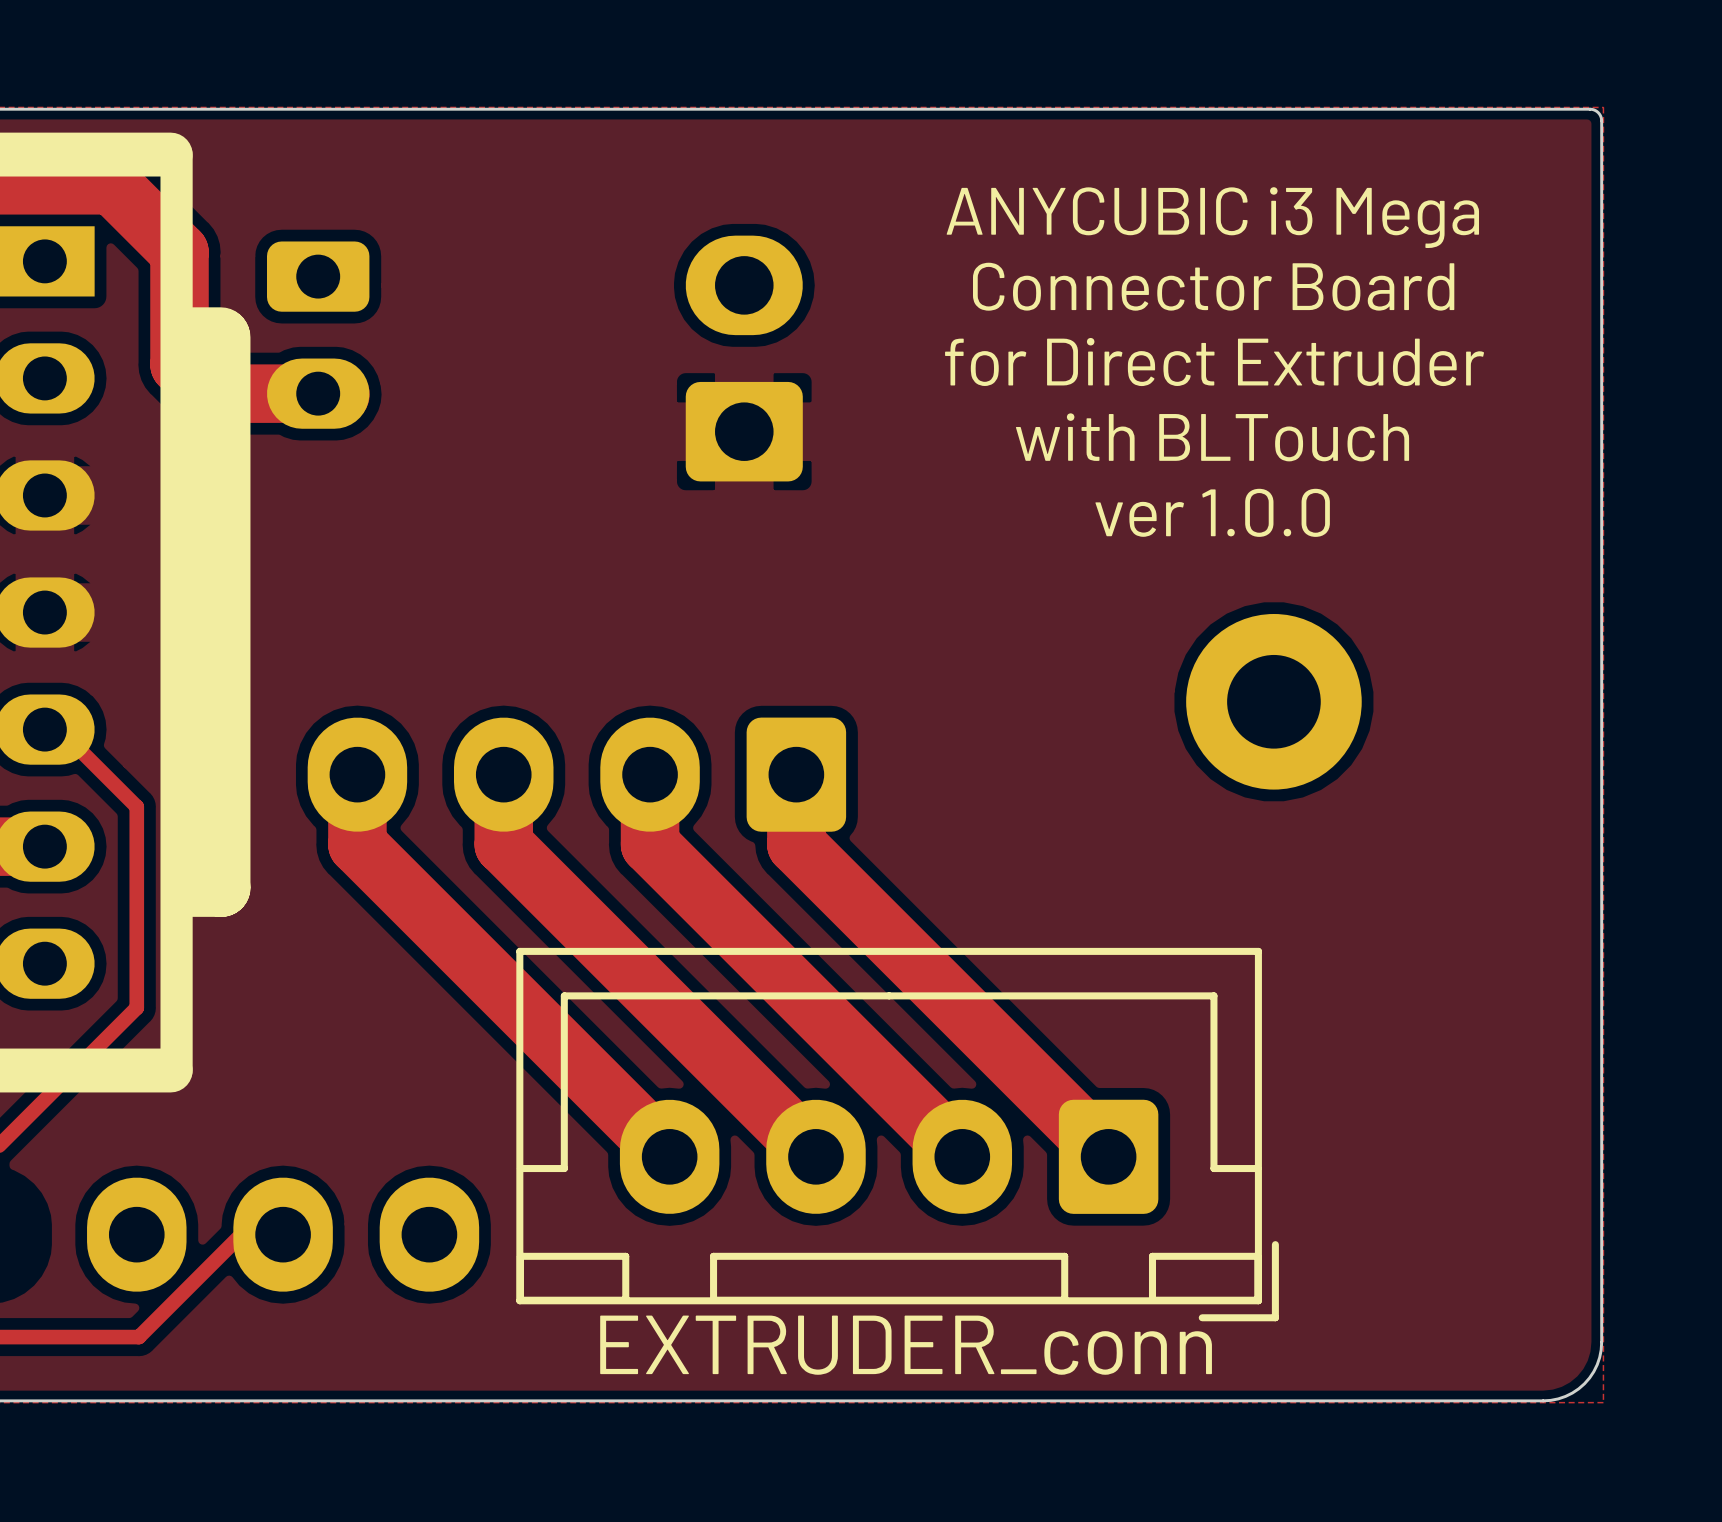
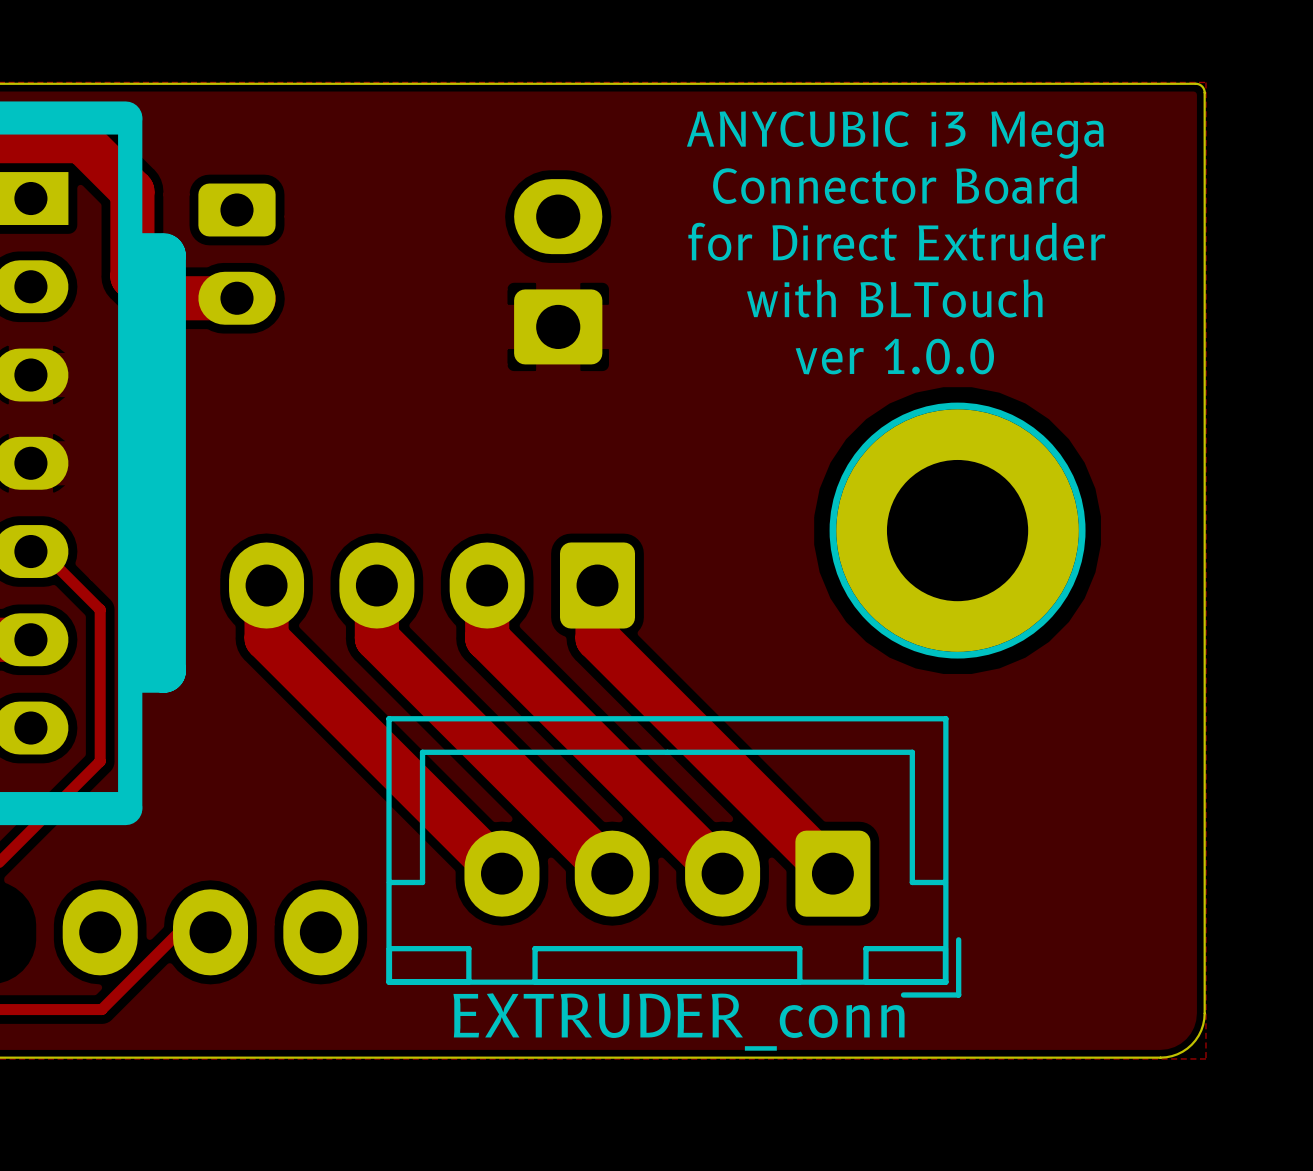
text position: ANYCUBIC i3 Mega (1212, 217) -> ANYCUBIC i3 Mega (895, 134)
text position: Connector Board (1213, 286) -> Connector Board (895, 184)
text position: for Direct Extruder (1214, 362) -> for Direct Extruder (896, 241)
text position: with BLTouch (1212, 437) -> with BLTouch (894, 298)
text position: ver 1.0.0 (1212, 512) -> ver 1.0.0 (894, 356)
part footprint: [1186, 614, 1362, 790] -> [829, 402, 1086, 659]

